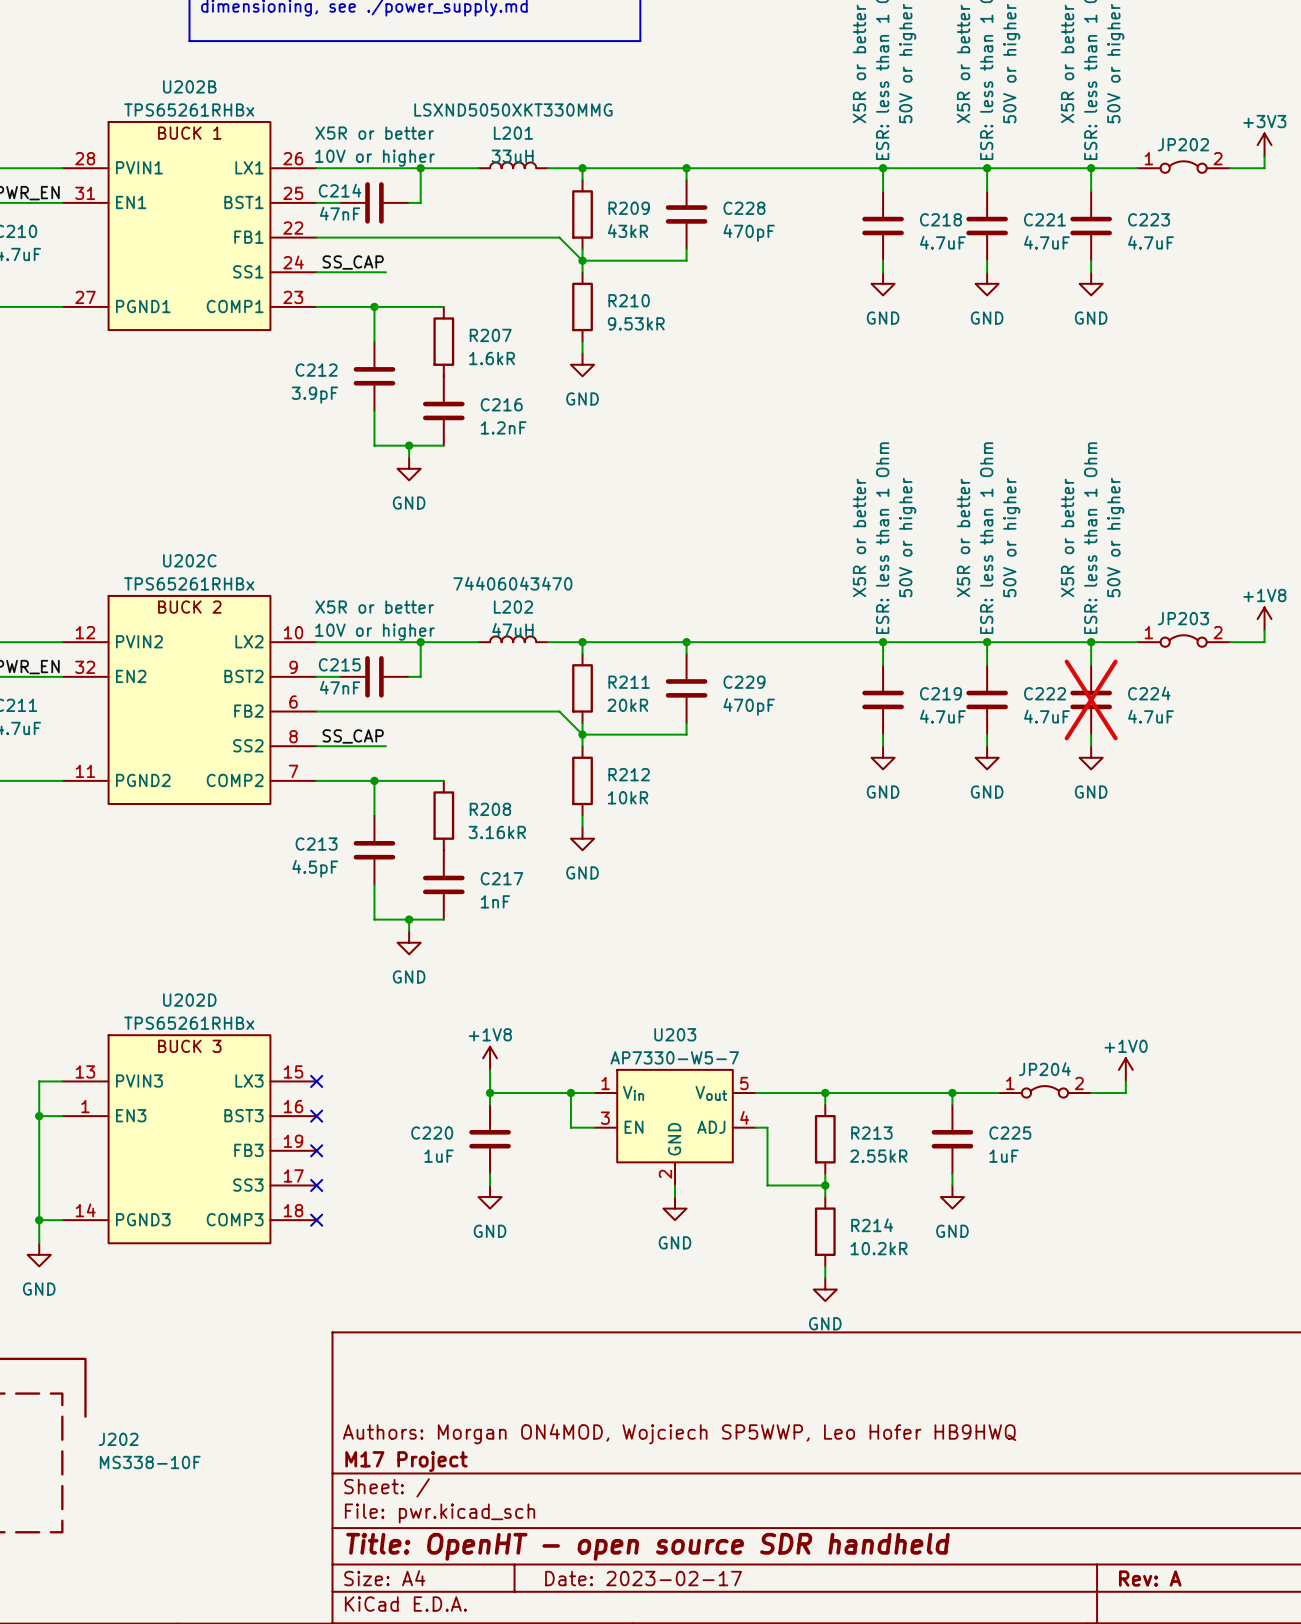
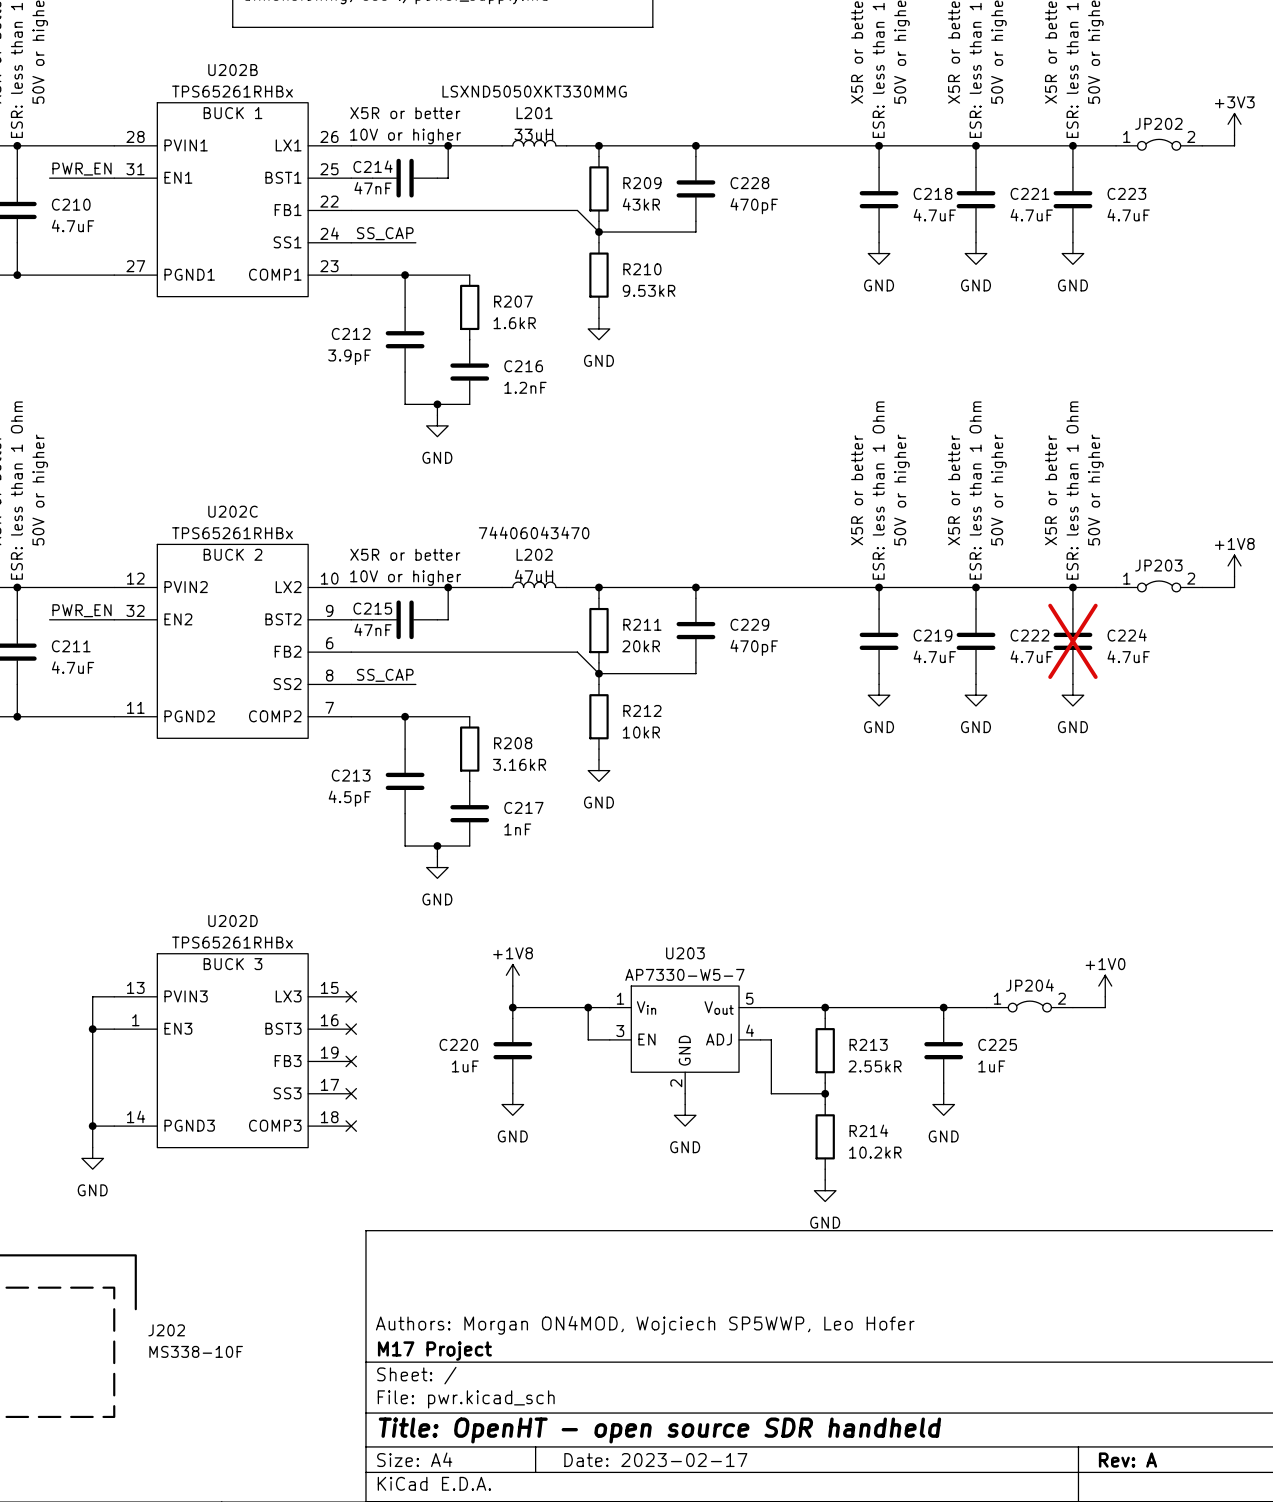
title block: Authors: Morgan ON4MOD, Wojciech SP5WWP, Leo Hofer HB9HWQ (679, 1433) -> Authors: Morgan ON4MOD, Wojciech SP5WWP, Leo Hofer (645, 1325)

